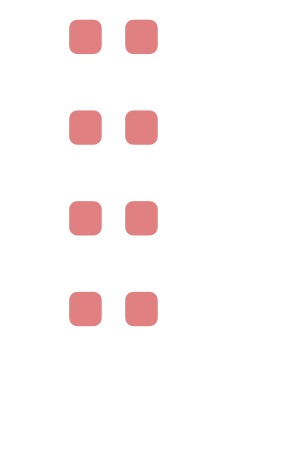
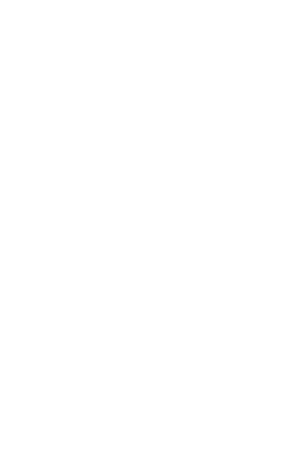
part: (113, 36) -> none
part: (113, 127) -> none
part: (113, 218) -> none
part: (113, 309) -> none

